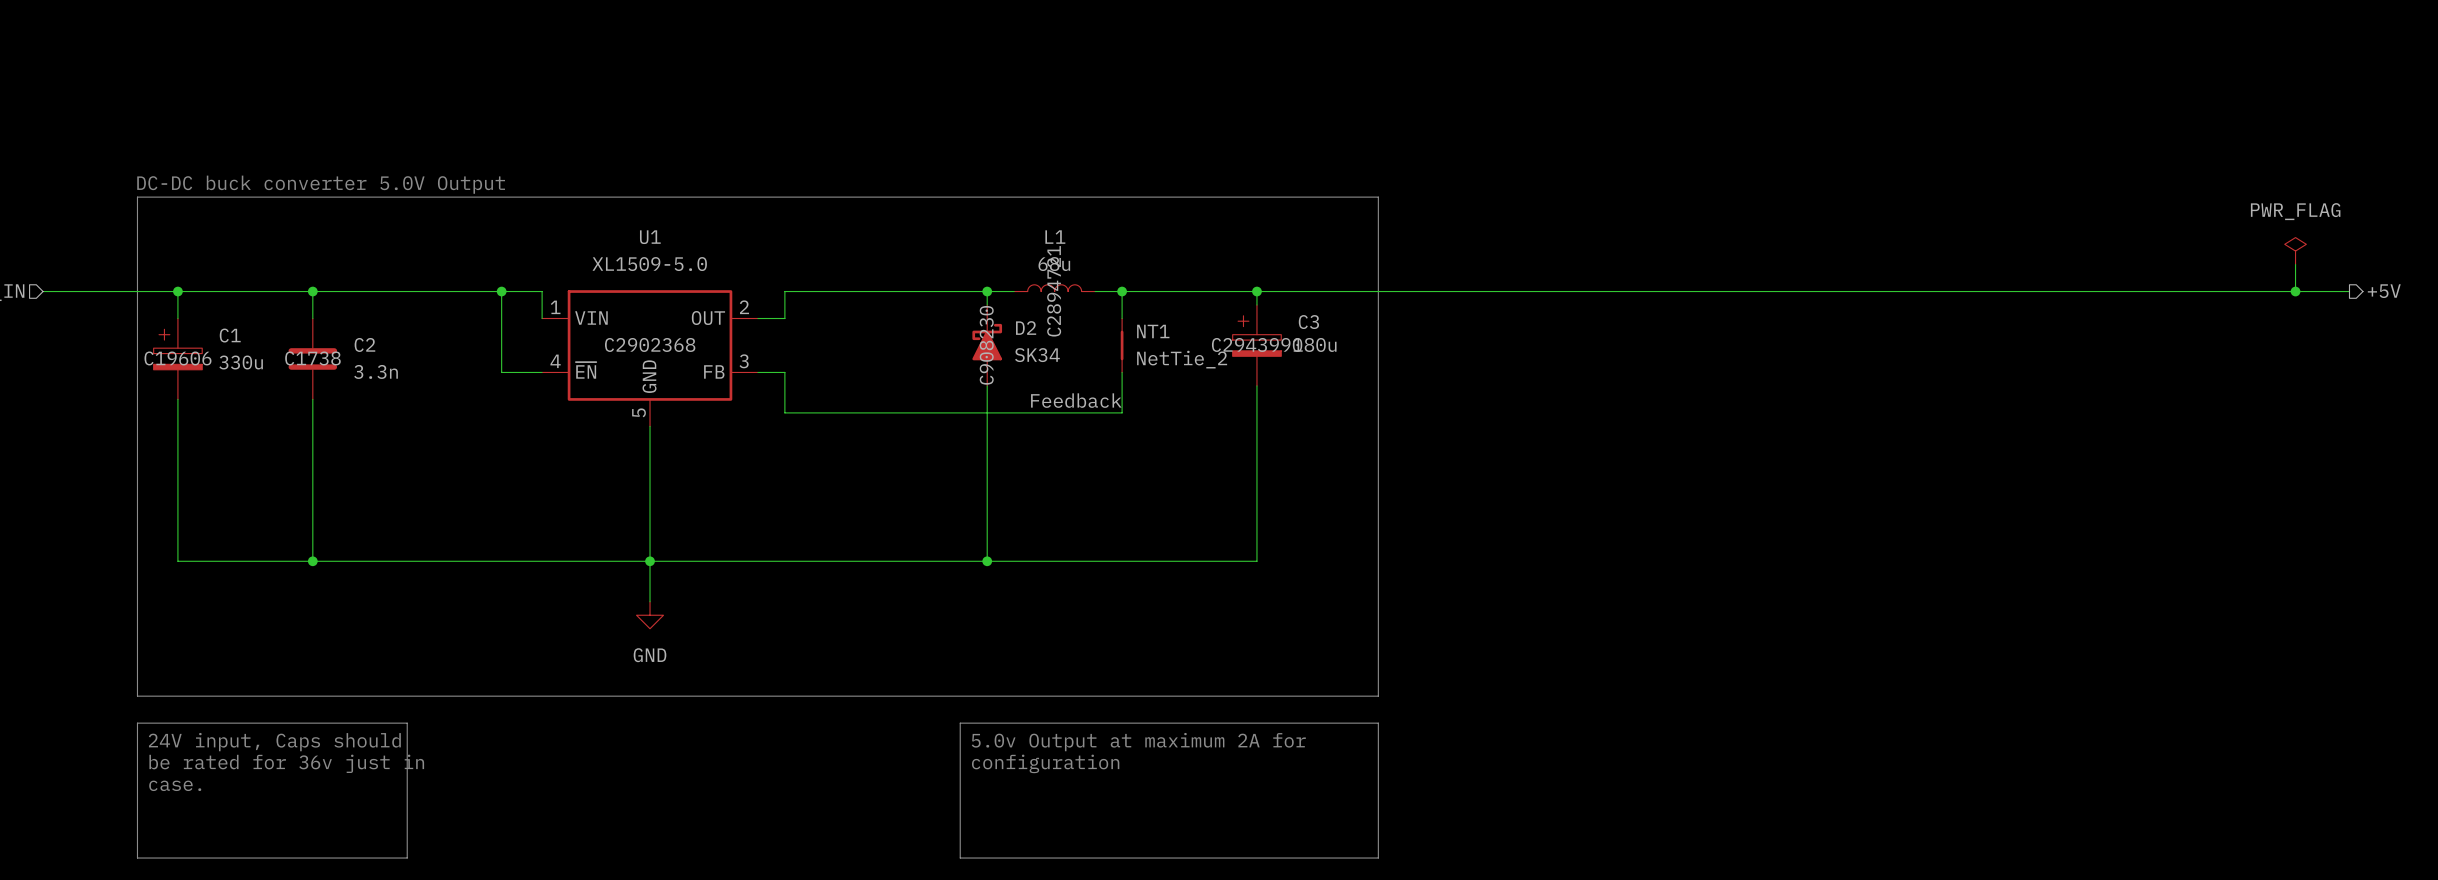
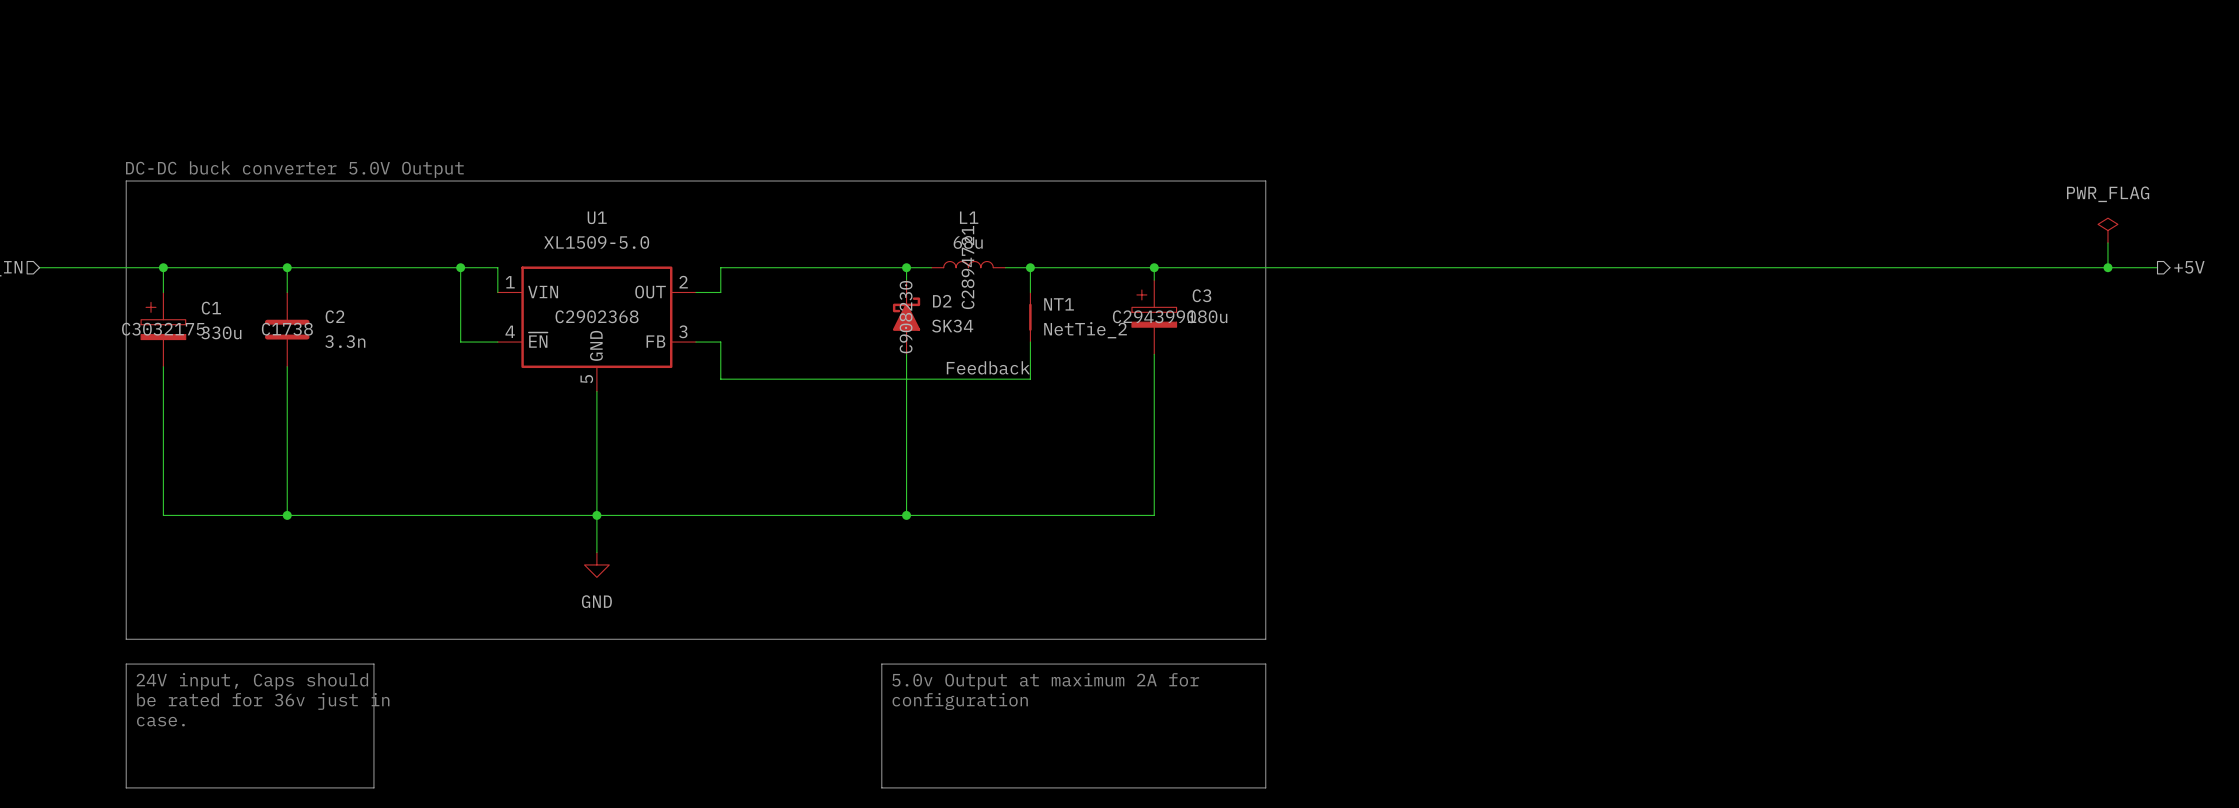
C1 text: C19606 (177, 358) -> C3032175 (163, 329)

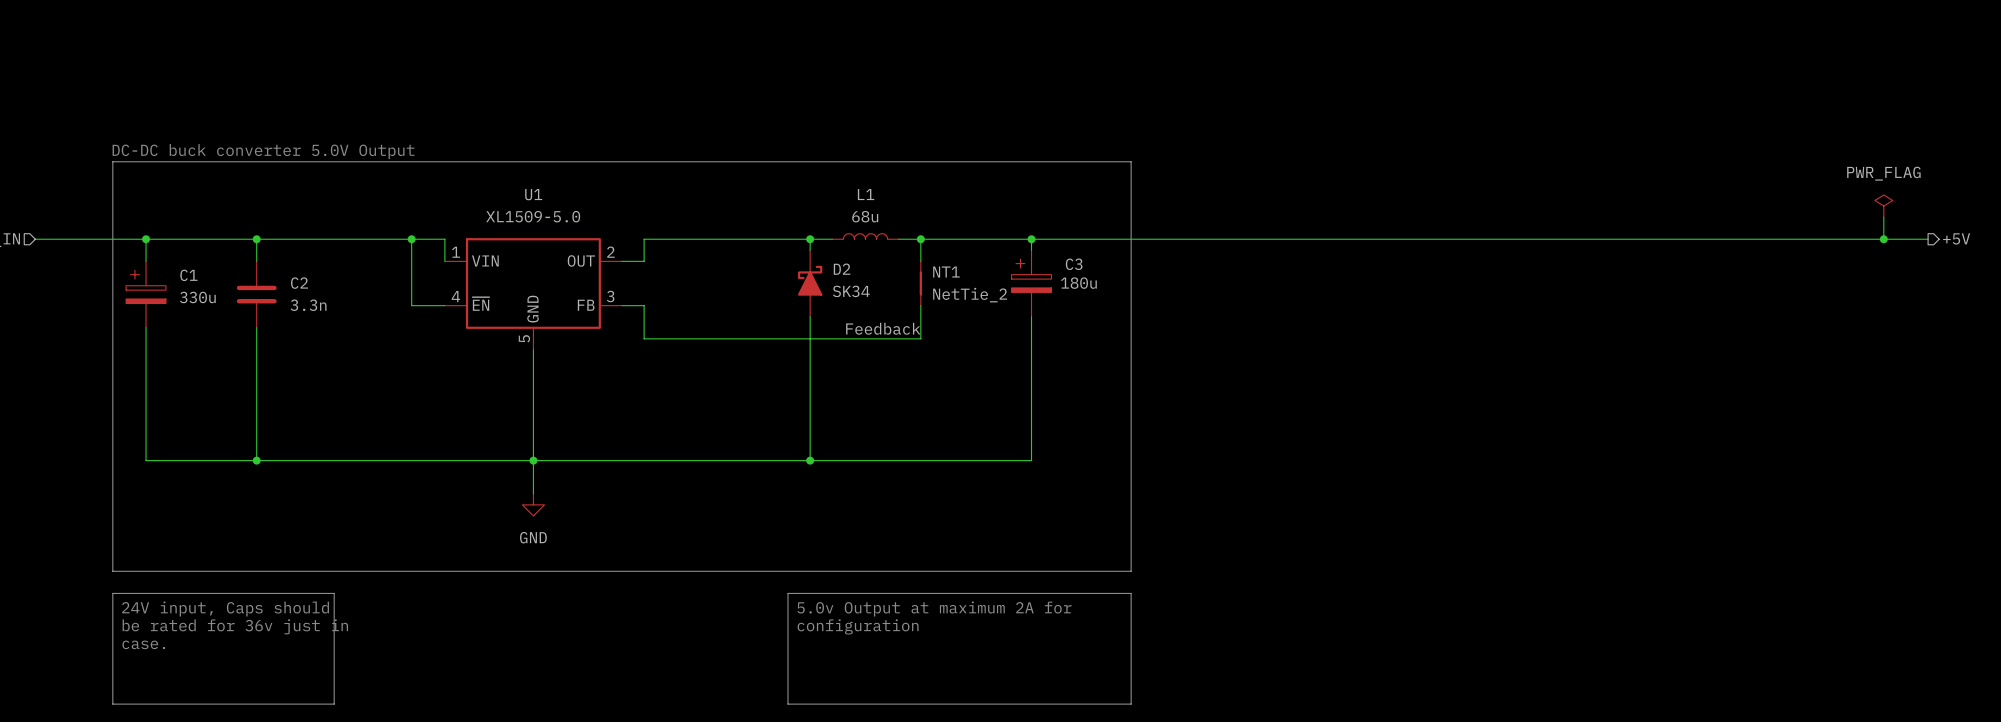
L1 text: C2894721 (968, 267) -> none
U1 text: C2902368 (597, 316) -> none
C3 text: C2943990 (1154, 316) -> none
D2 text: C908230 (906, 317) -> none
C1 text: C3032175 (163, 329) -> none
C2 text: C1738 (287, 329) -> none

